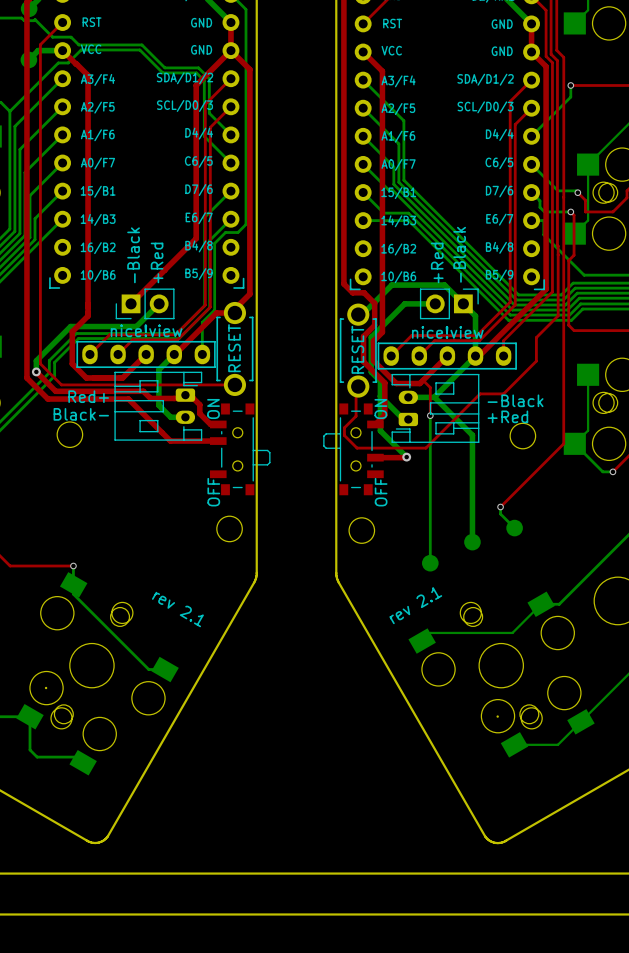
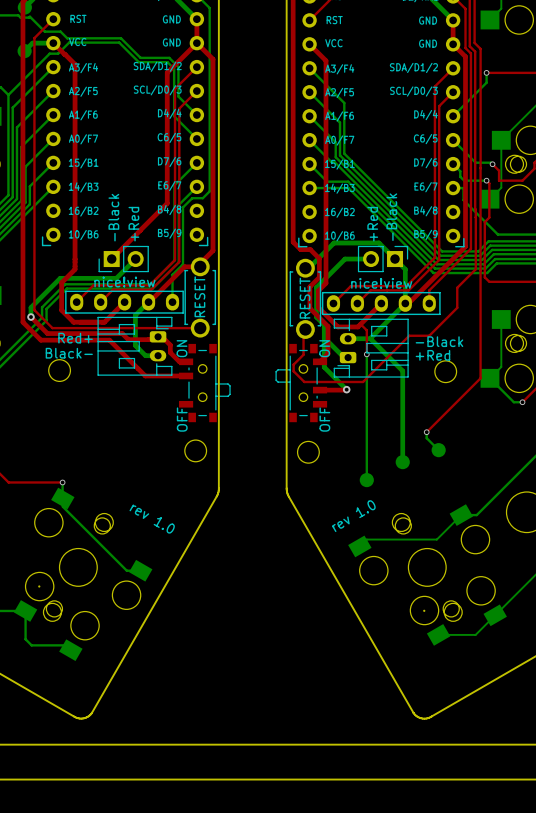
text: rev 2.1 (415, 605) -> rev 1.0 (353, 516)
text: rev 2.1 (177, 609) -> rev 1.0 (152, 519)

